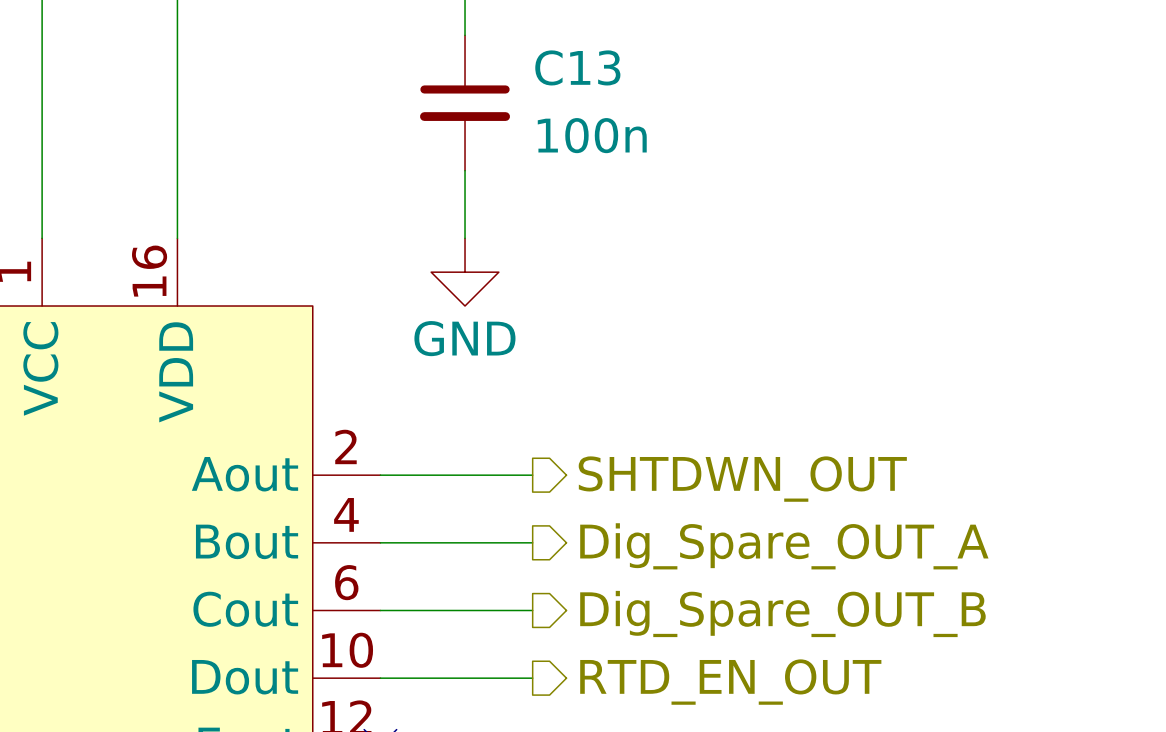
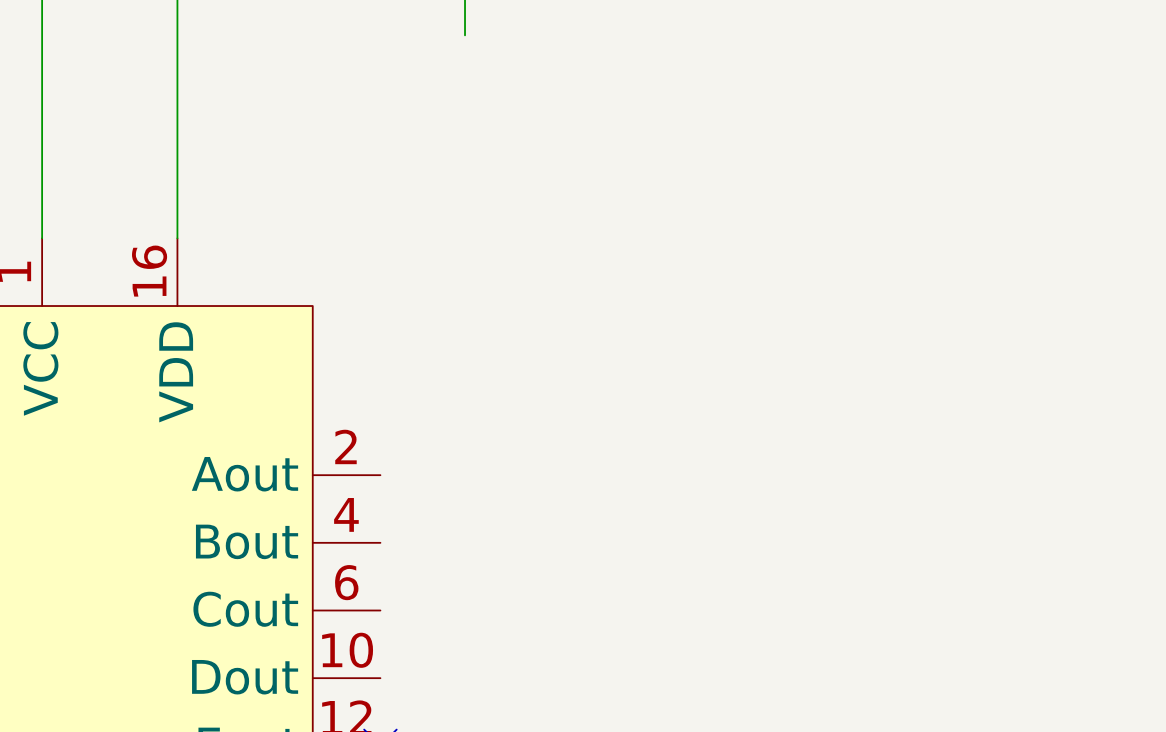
C13: 100n (465, 103) -> none
wire: (465, 170) (465, 238) -> none
power symbol: GND (465, 272) -> none
wire: (380, 475) (532, 475) -> none
hierarchical label: SHTDWN_OUT (742, 479) -> none
wire: (380, 542) (532, 542) -> none
hierarchical label: Dig_Spare_OUT_A (784, 546) -> none
wire: (380, 610) (532, 610) -> none
hierarchical label: Dig_Spare_OUT_B (782, 613) -> none
wire: (380, 678) (532, 678) -> none
hierarchical label: RTD_EN_OUT (730, 682) -> none

